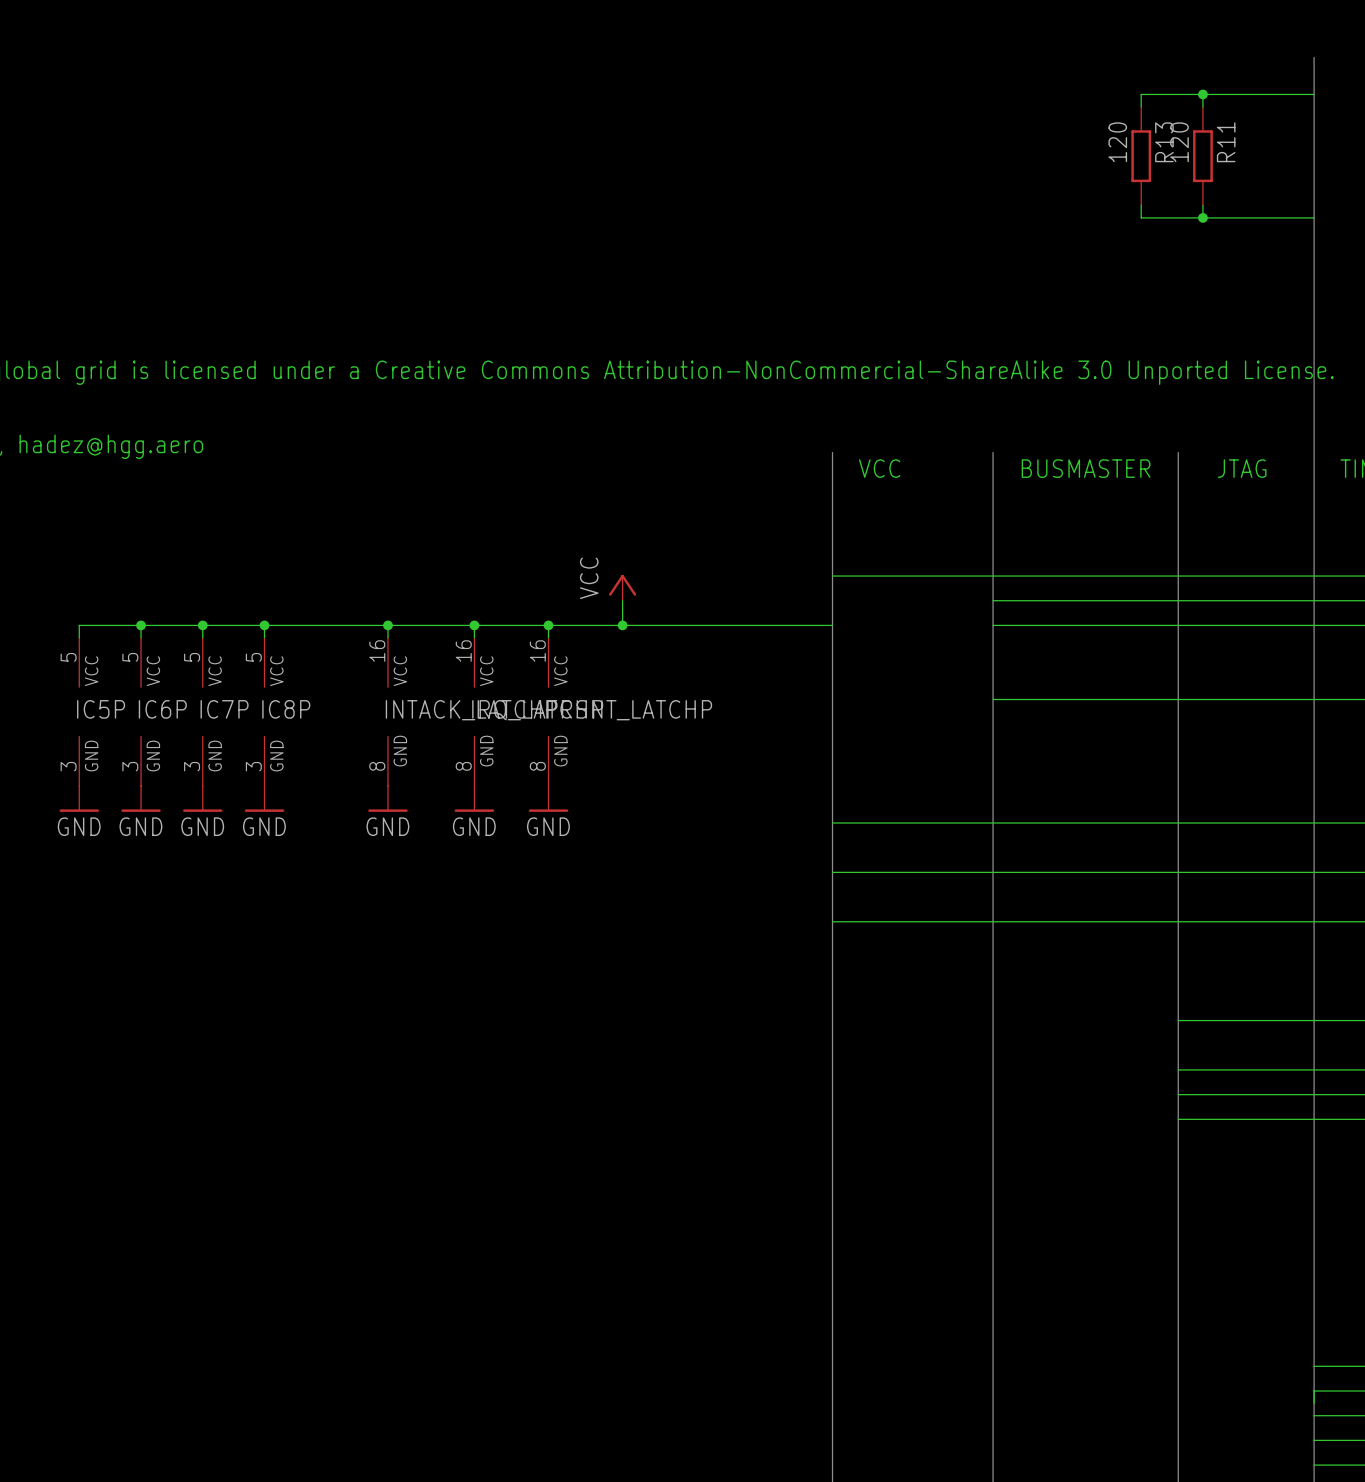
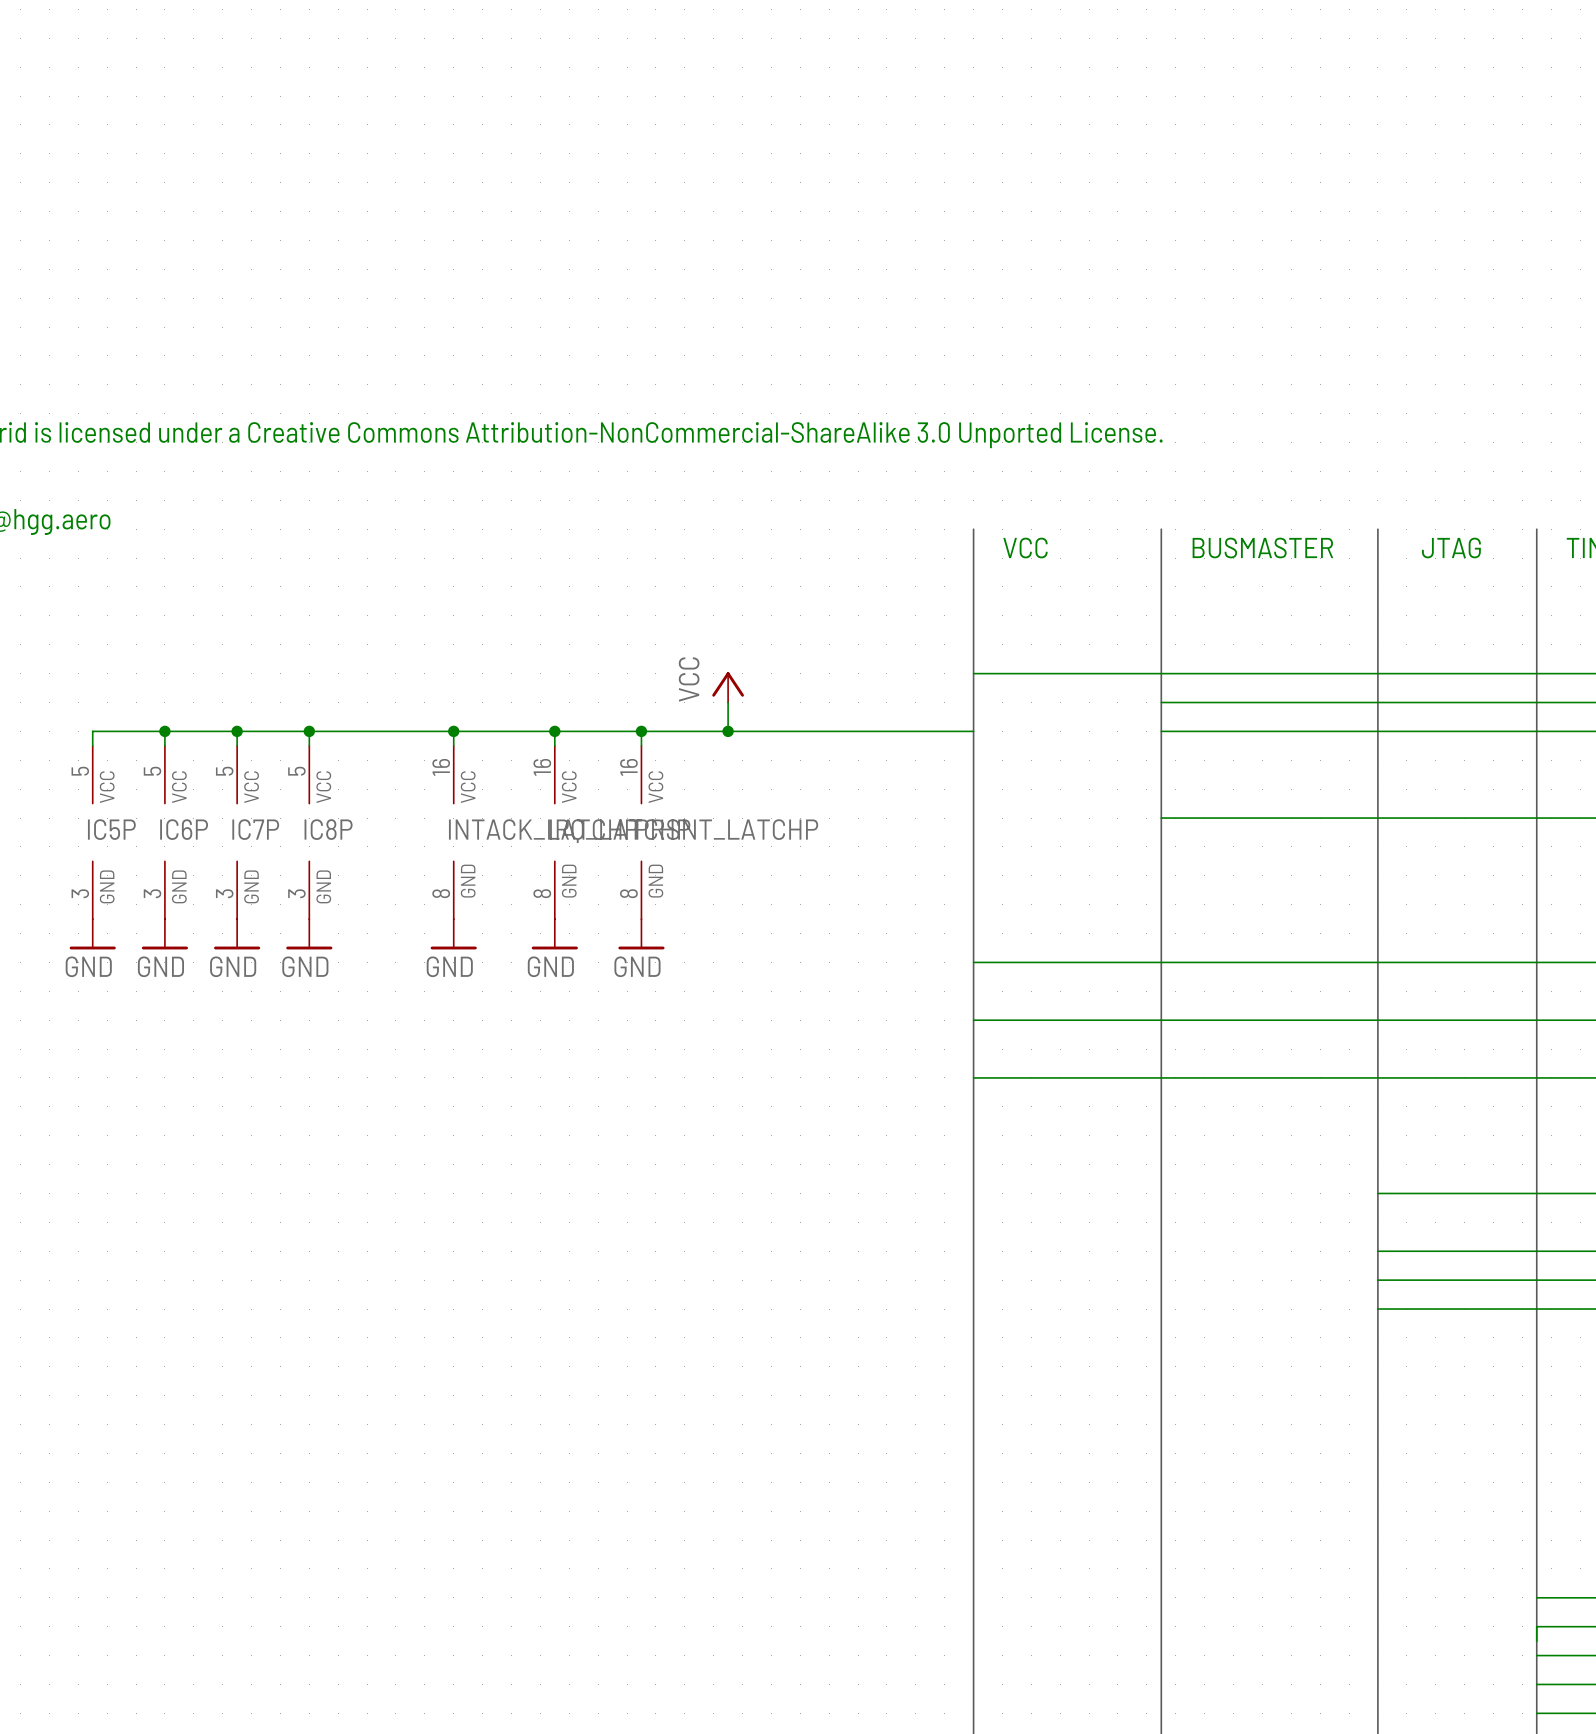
bus: (1314, 57) (1314, 452) -> none
wire: (1202, 94) (1202, 106) -> none
junction: (1202, 94) -> none
wire: (1314, 94) (1141, 94) (1141, 106) -> none
R13: 120 (1141, 156) -> none
R11: 120 (1202, 156) -> none
wire: (1141, 205) (1141, 217) (1314, 217) -> none
wire: (1202, 205) (1202, 217) -> none
junction: (1202, 217) -> none

